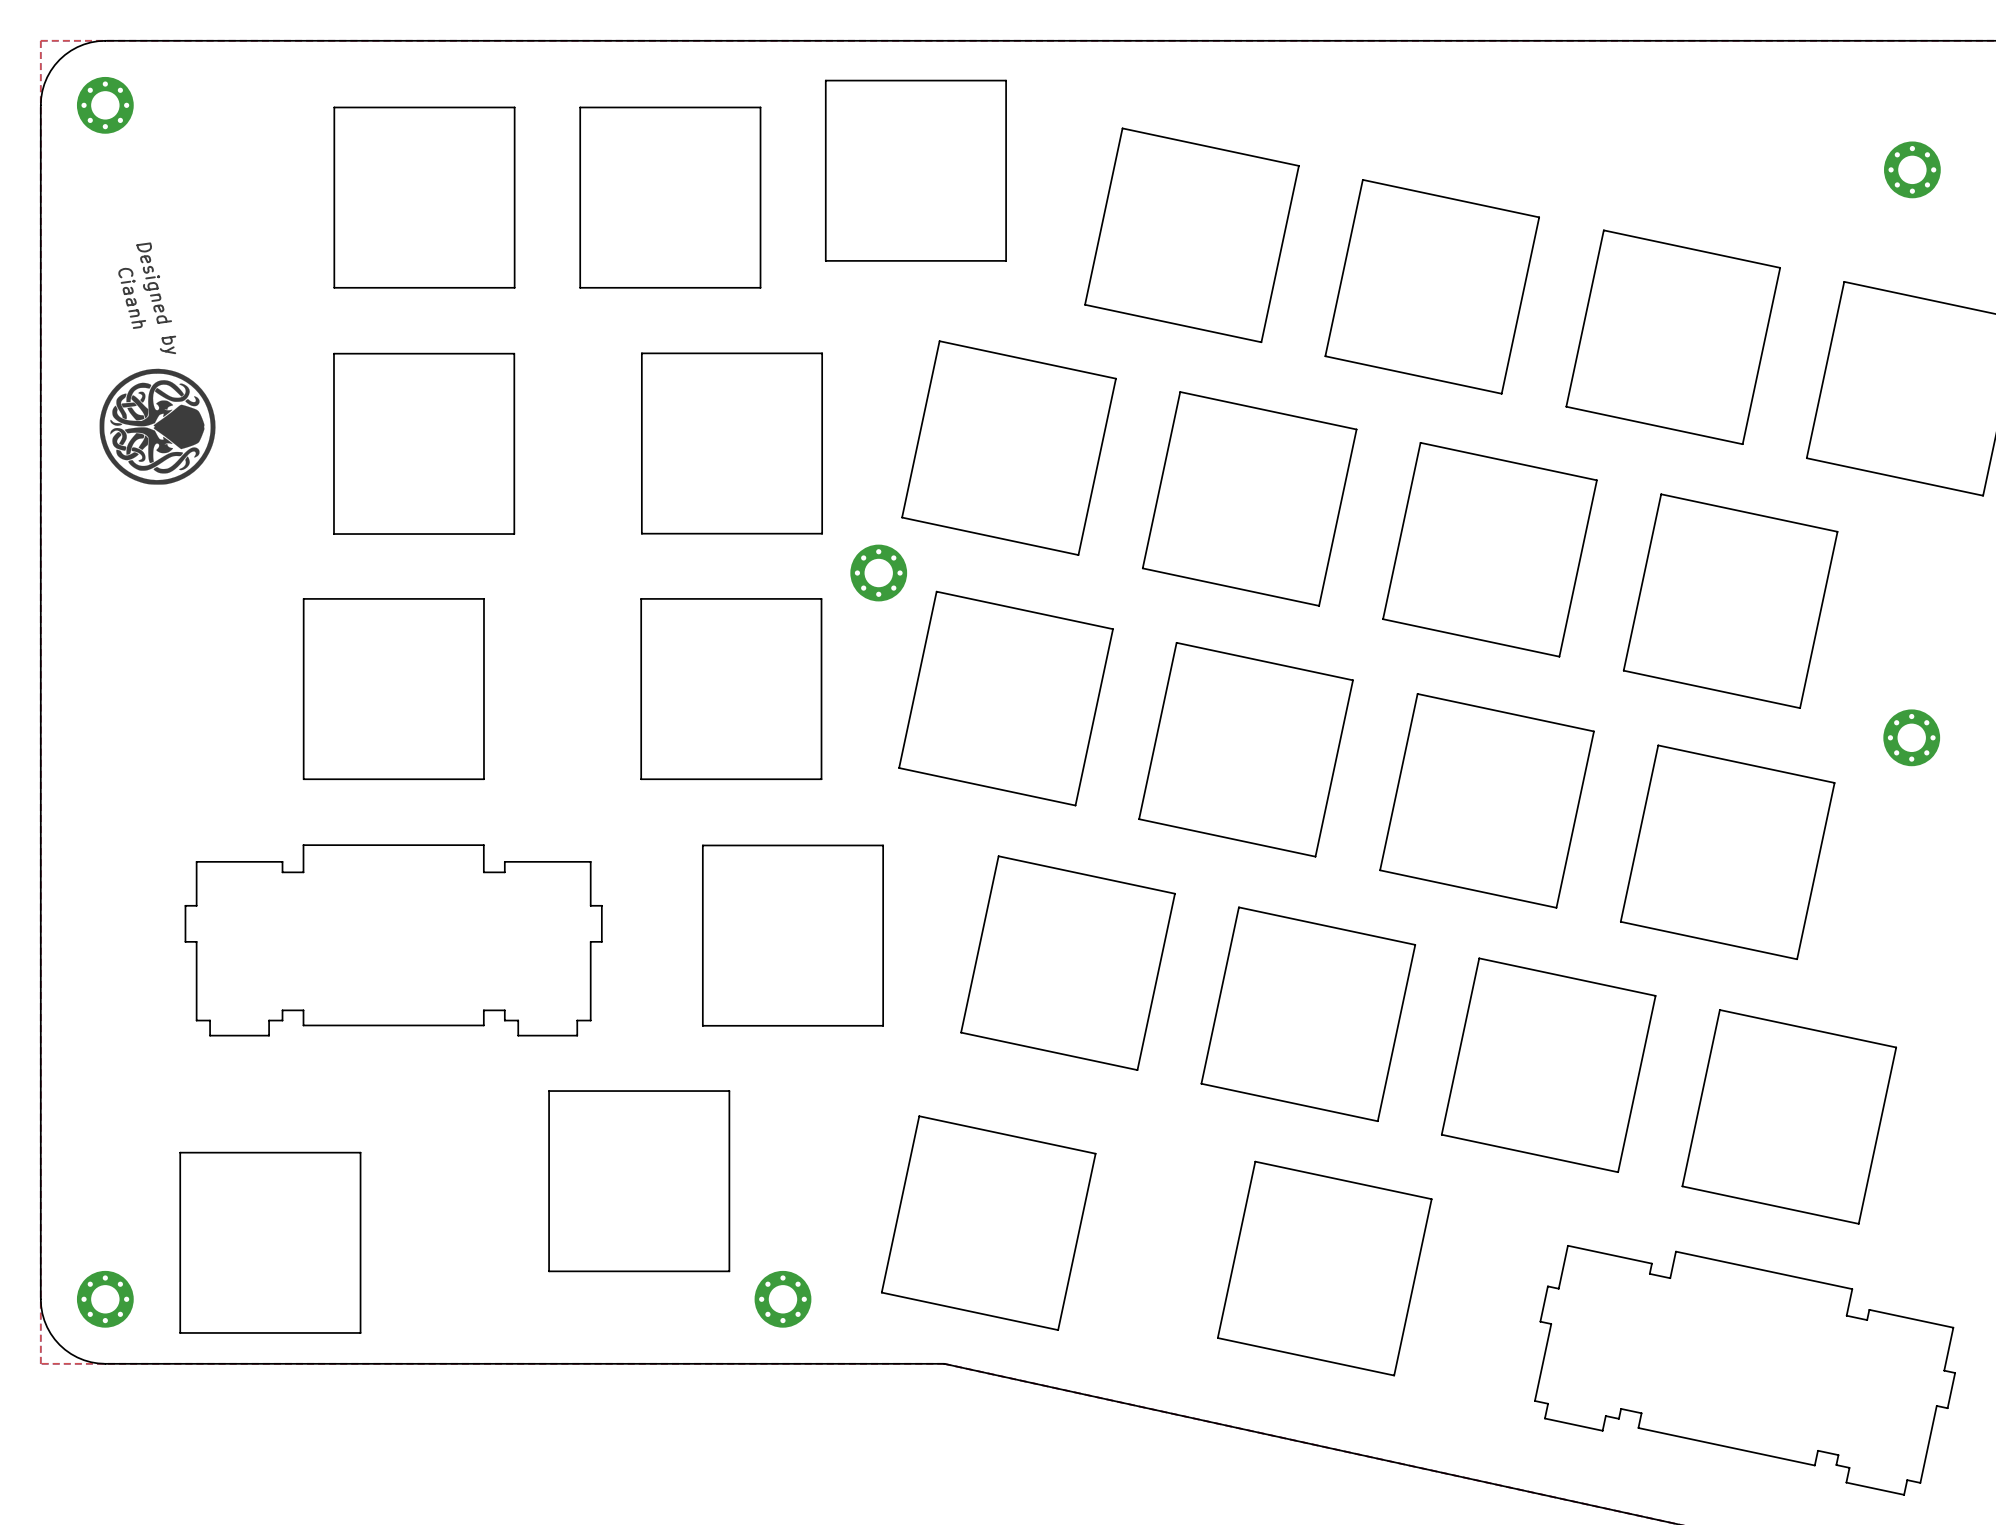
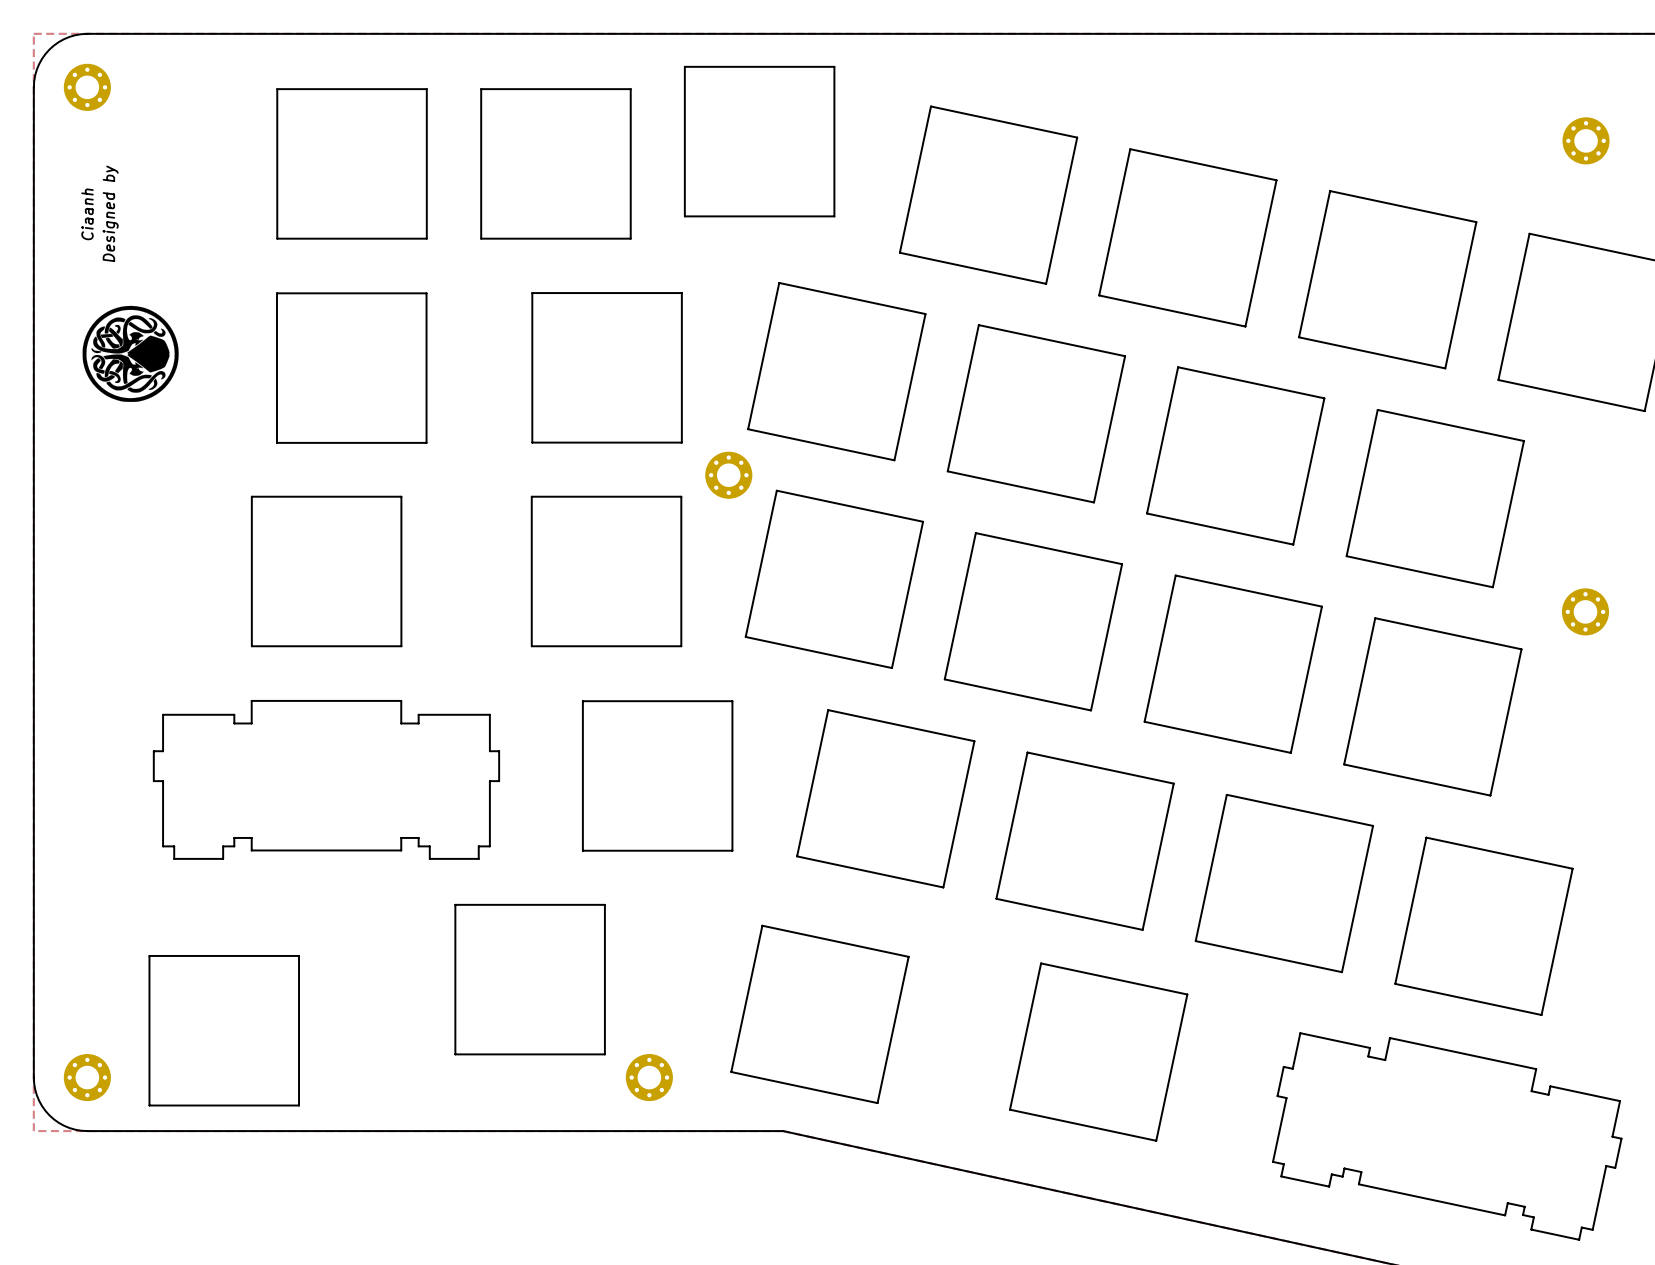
drawing shape: [99, 242, 216, 485] -> [81, 165, 179, 402]

